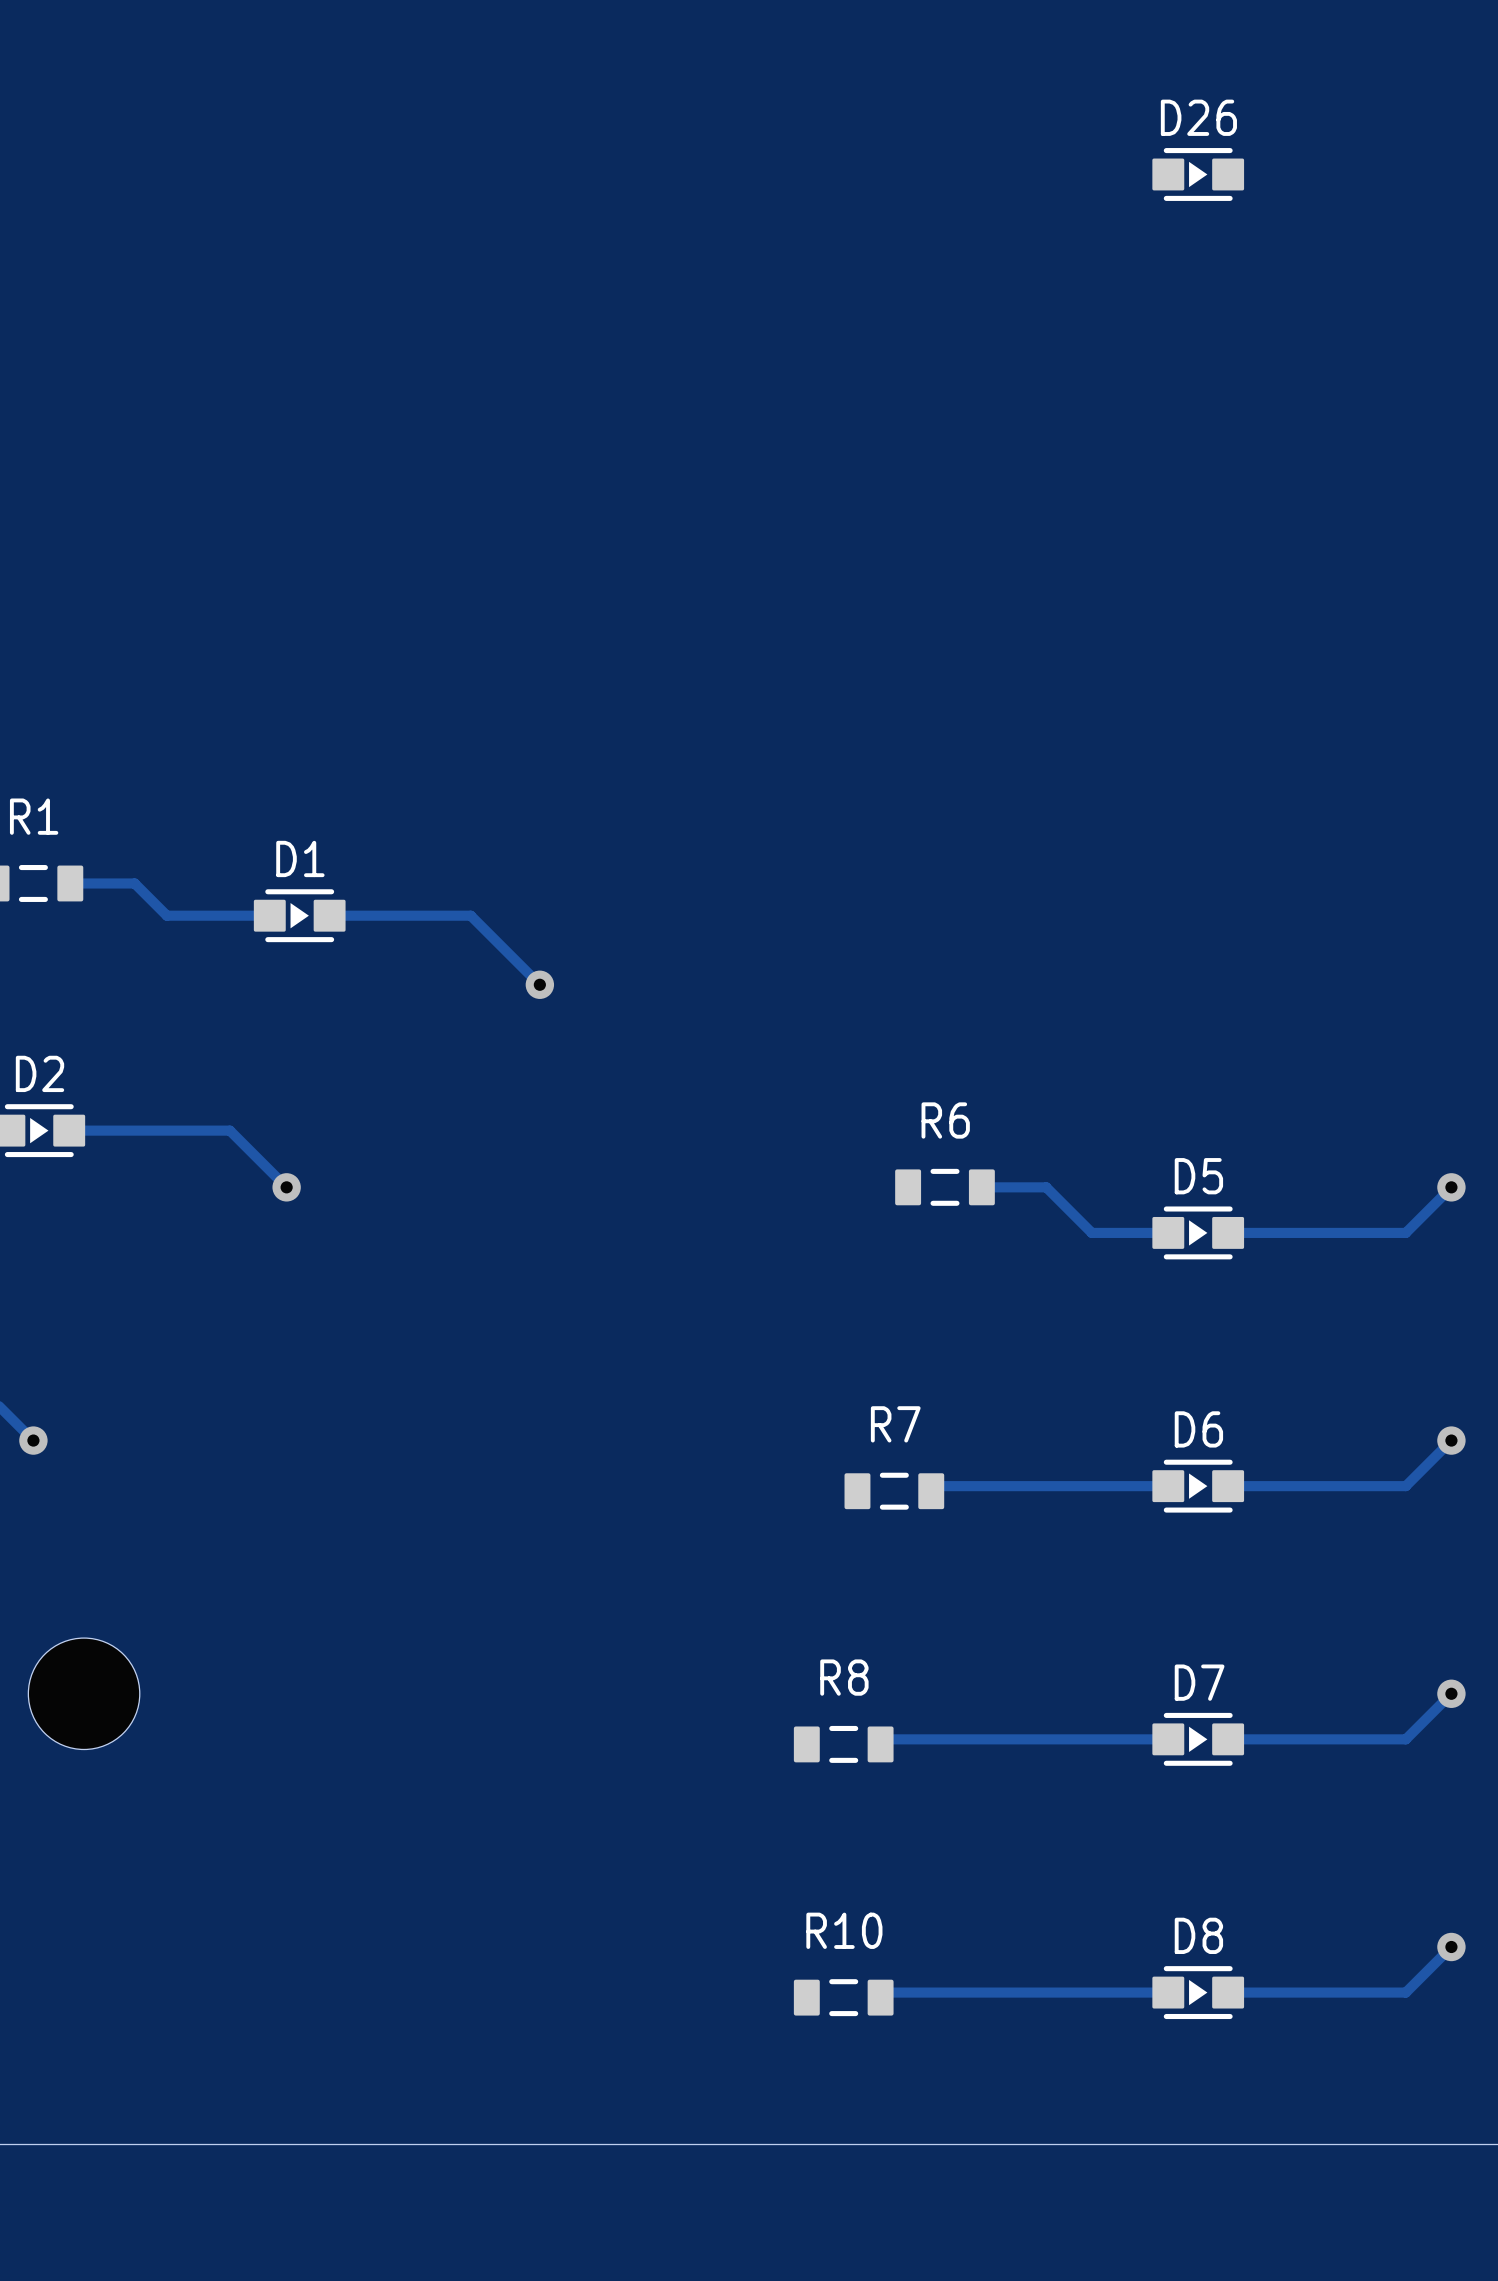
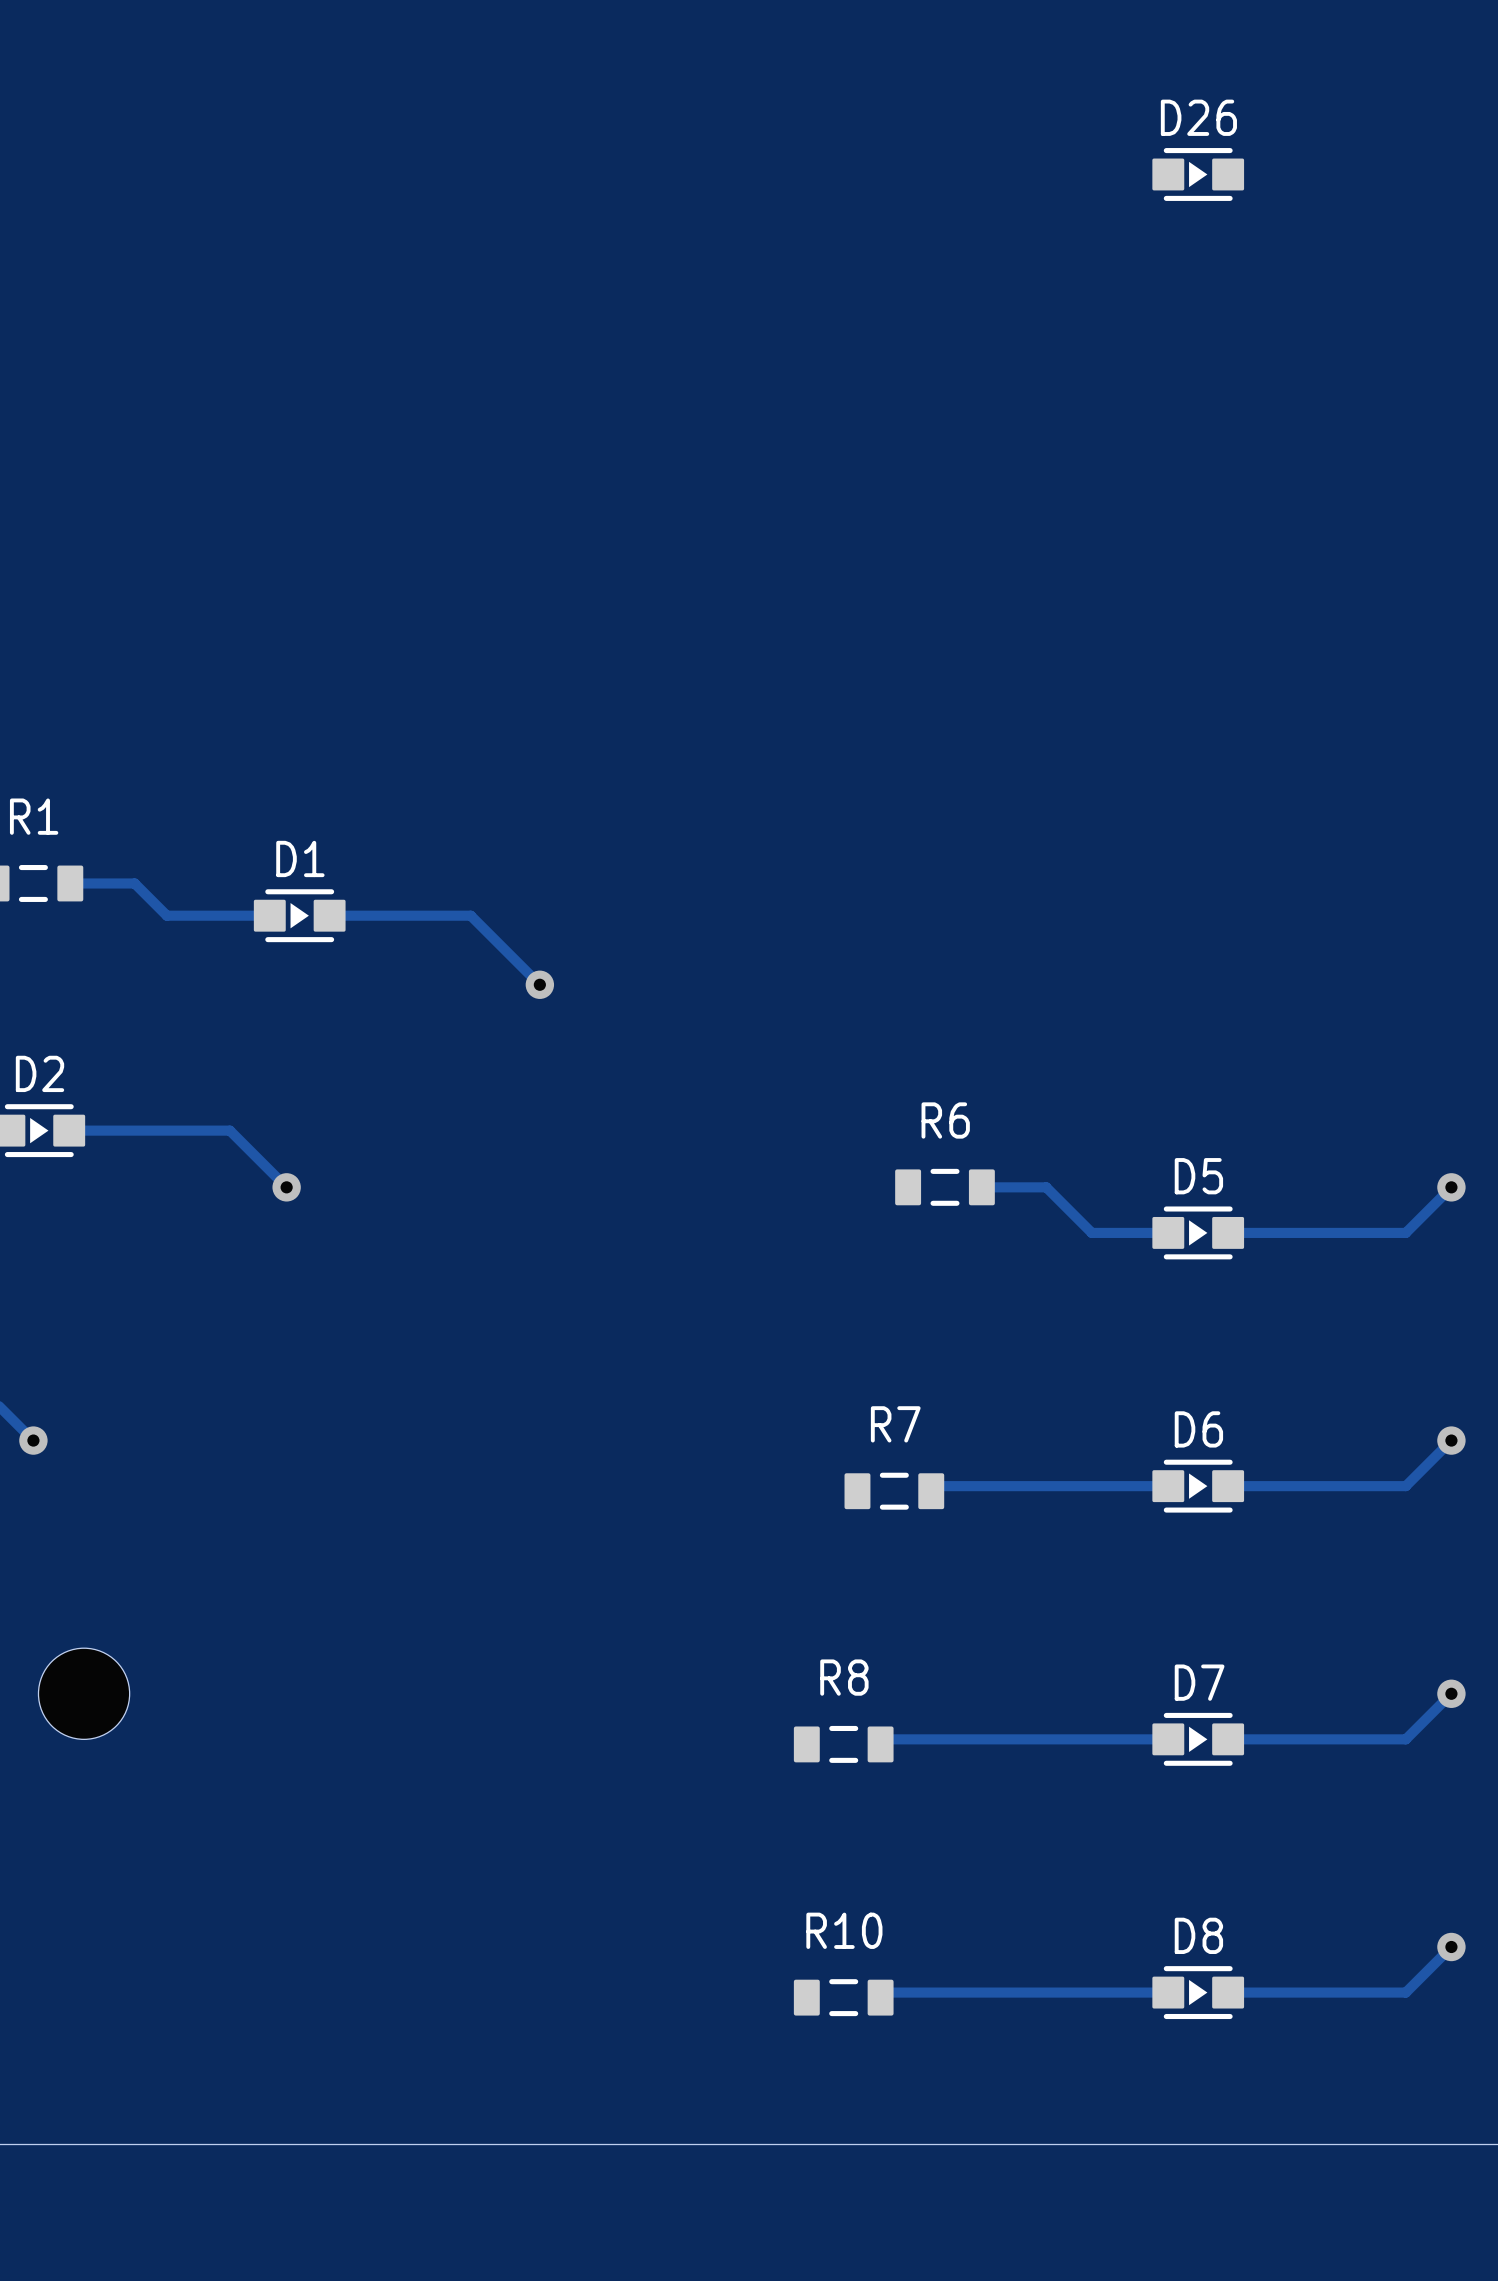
hole size: [28, 1638, 140, 1750] -> [38, 1648, 130, 1740]

